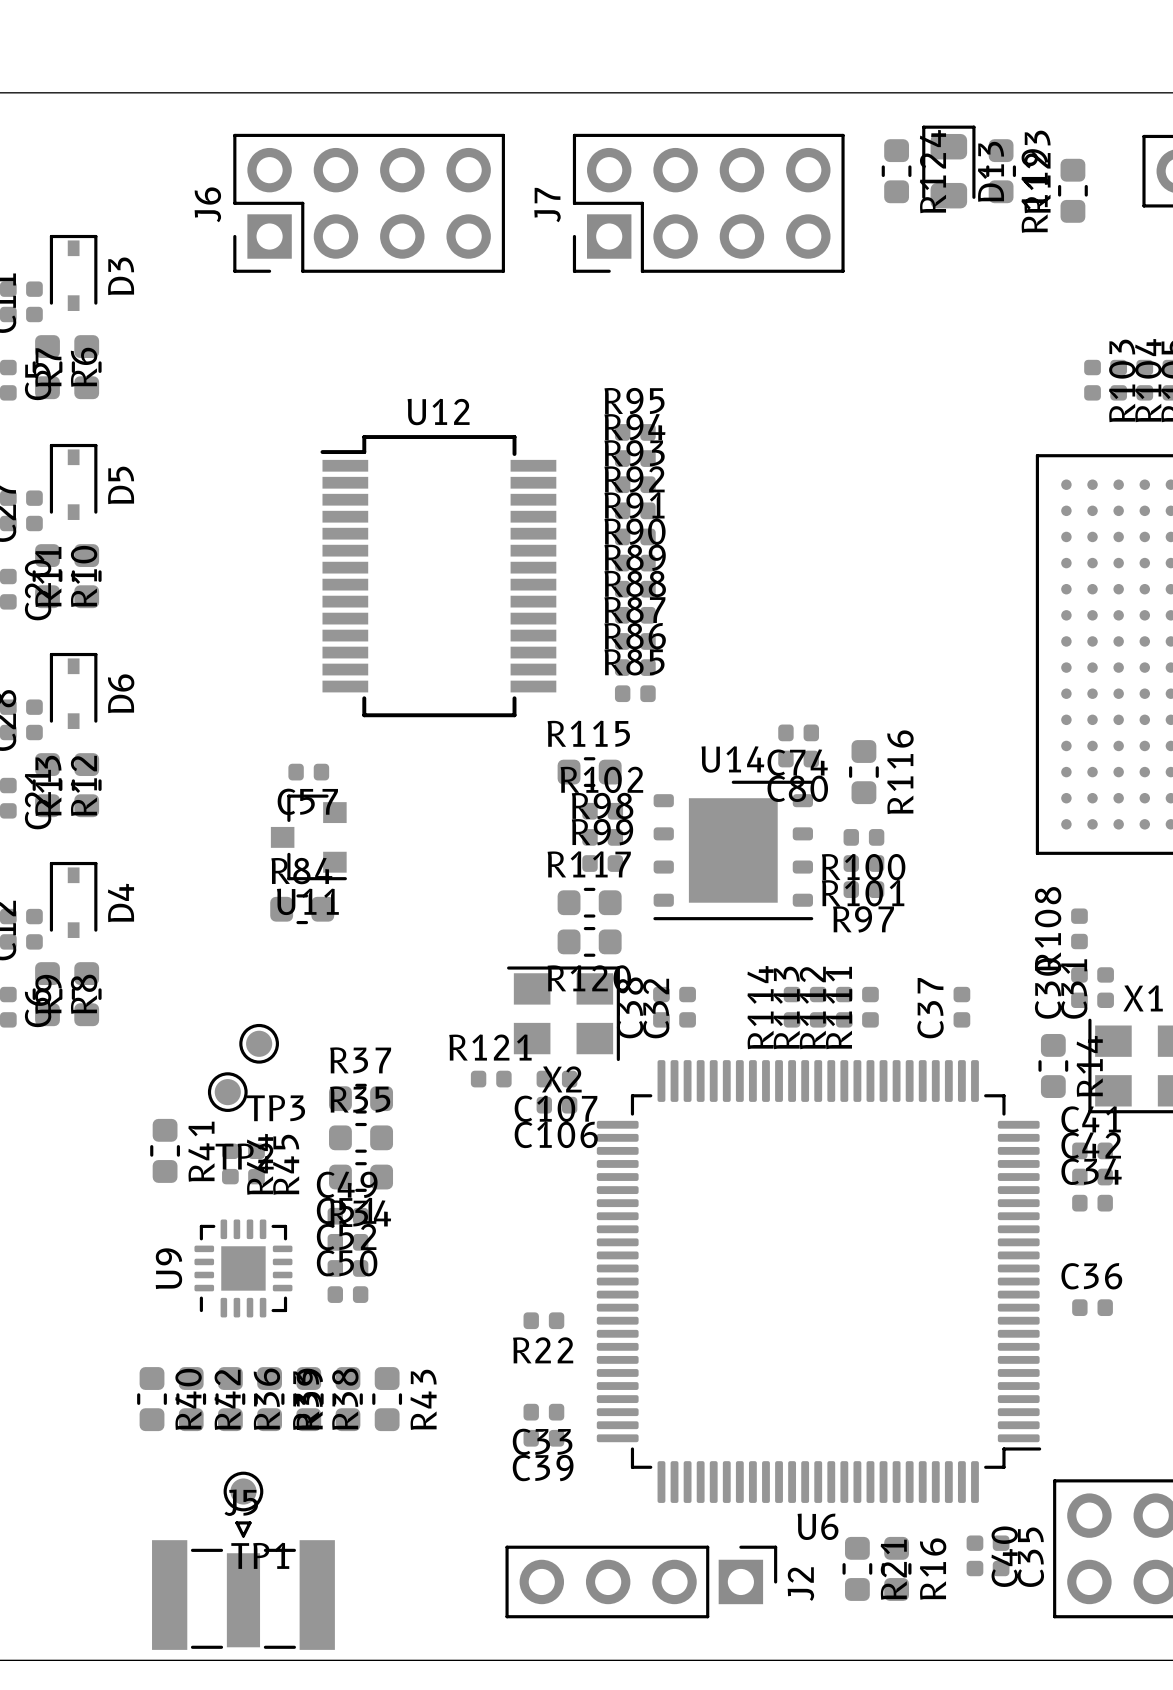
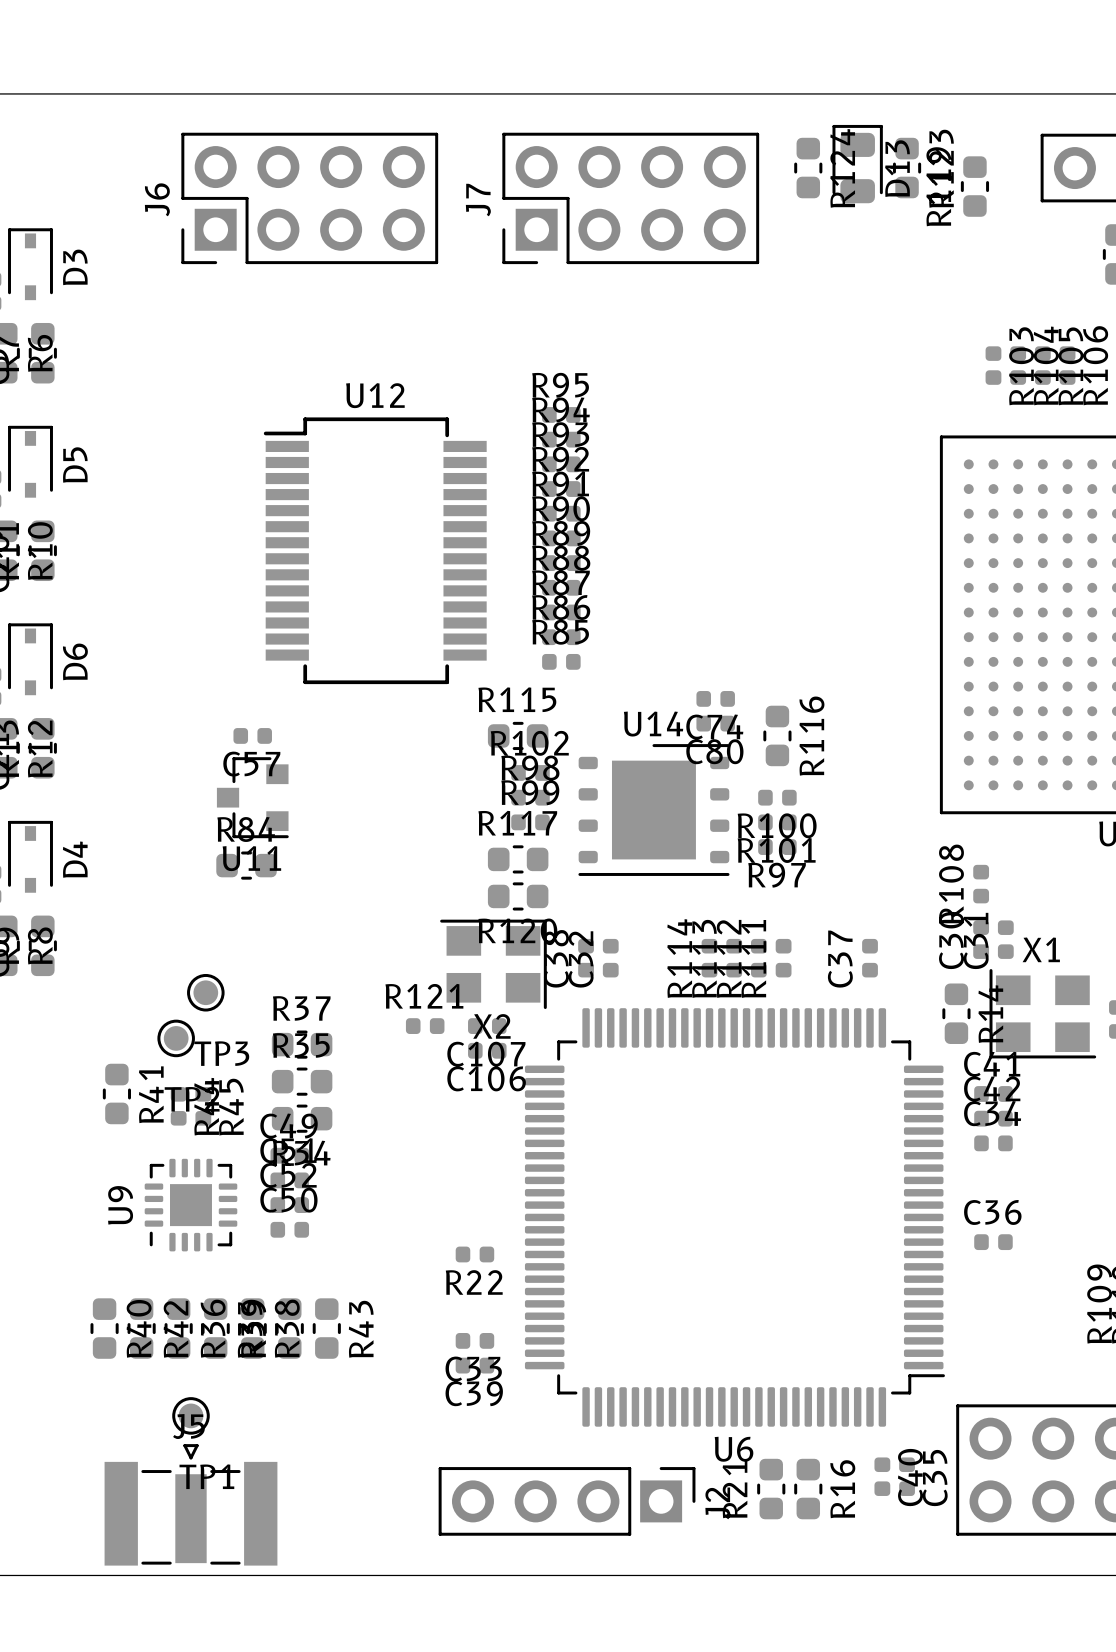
R21 name position: R21 (893, 1569) -> R21 (735, 1489)

